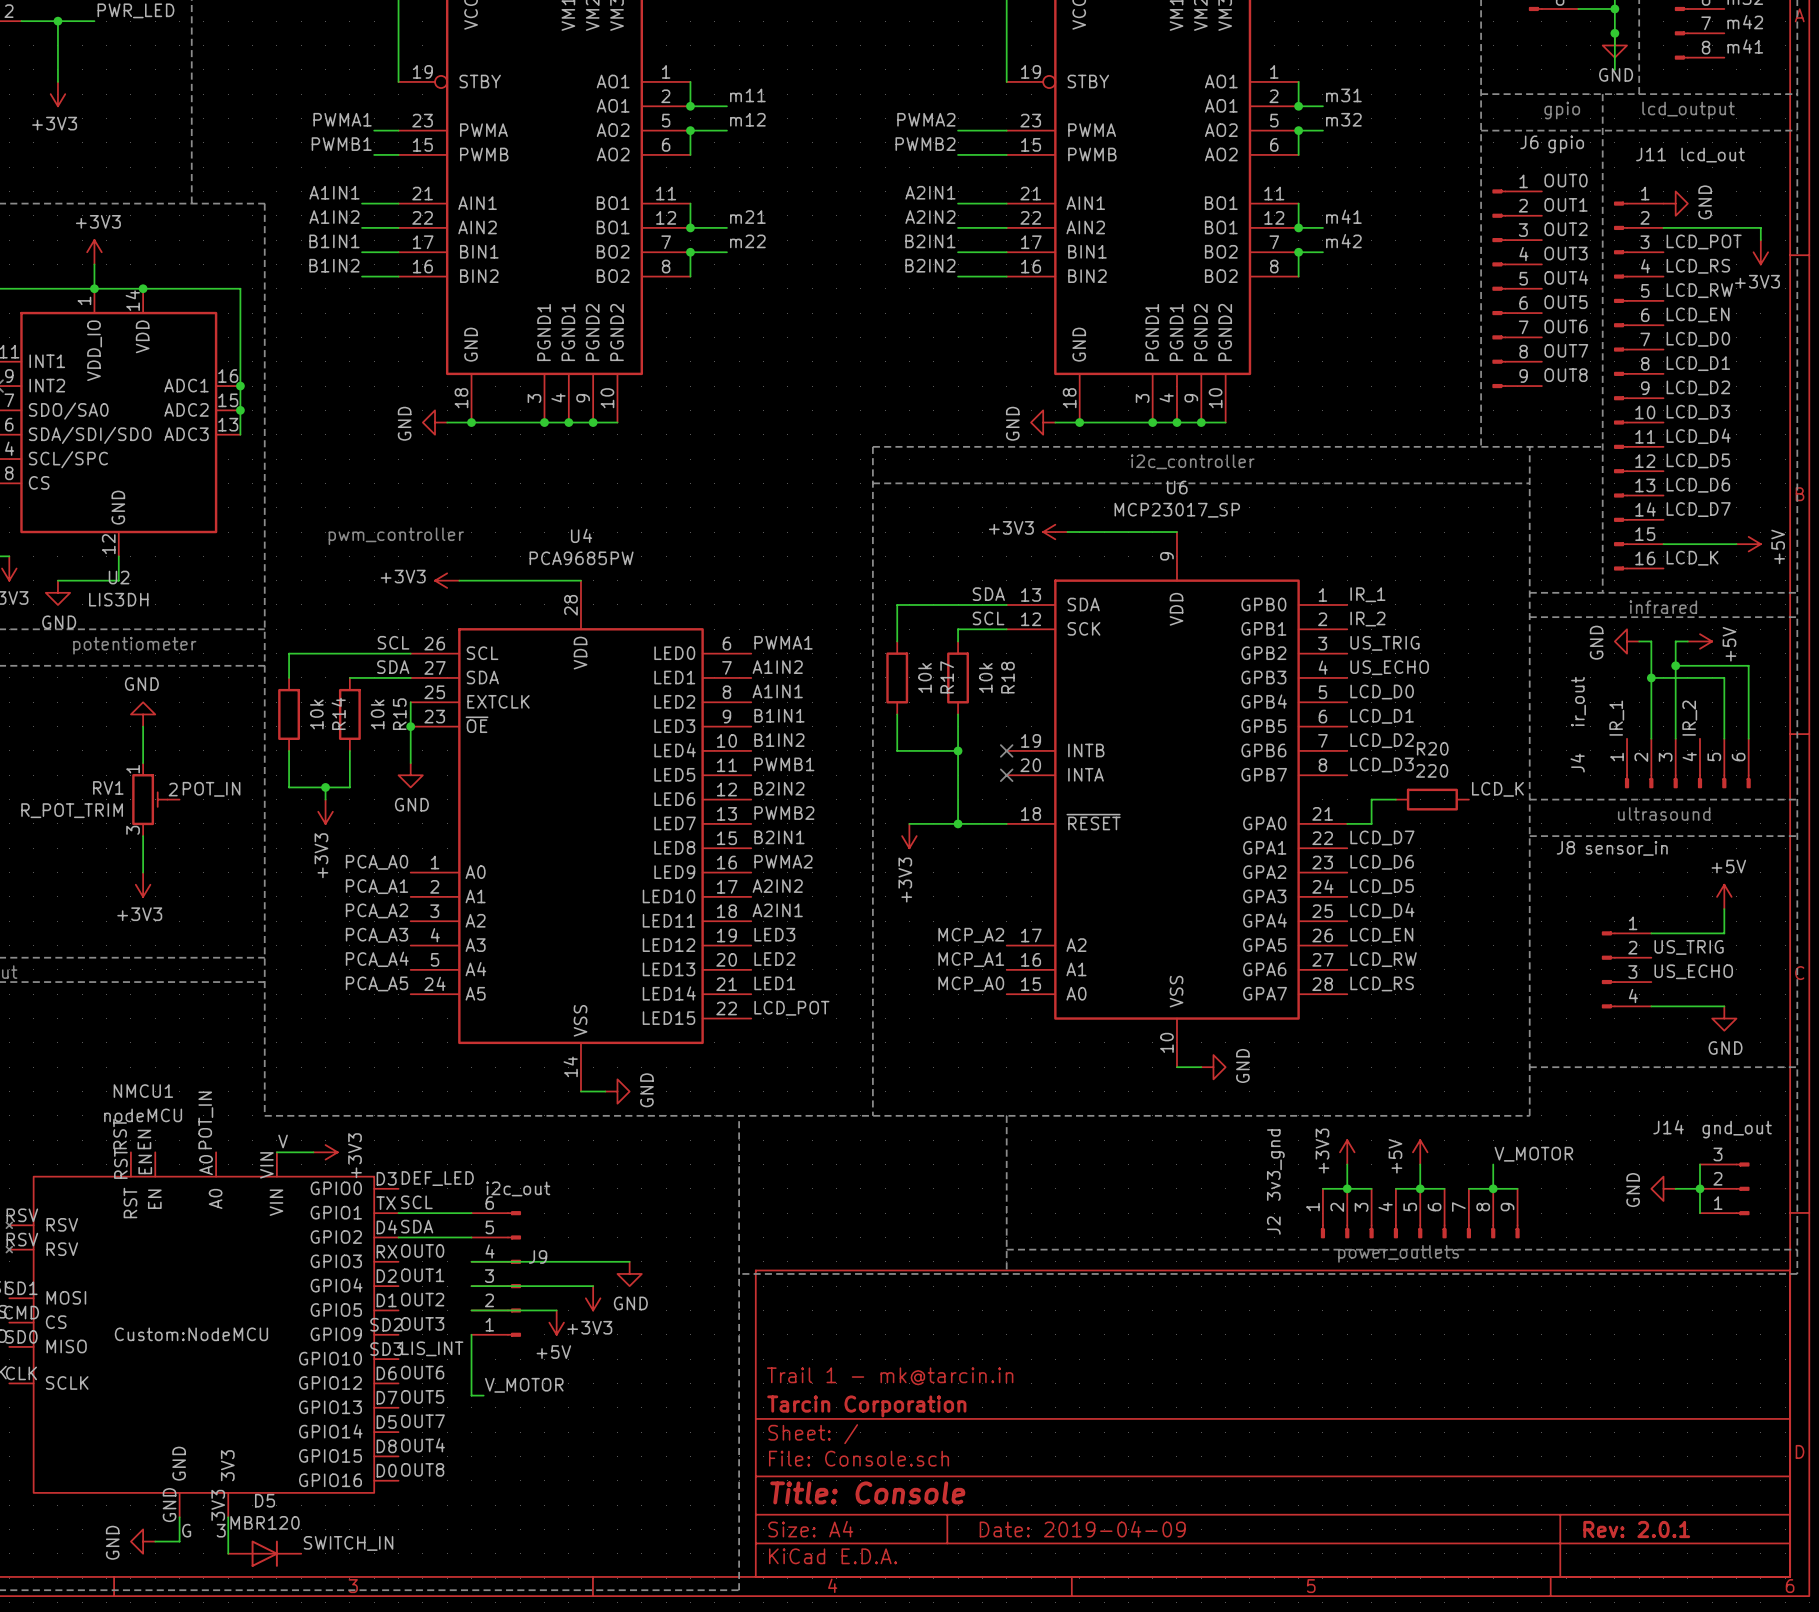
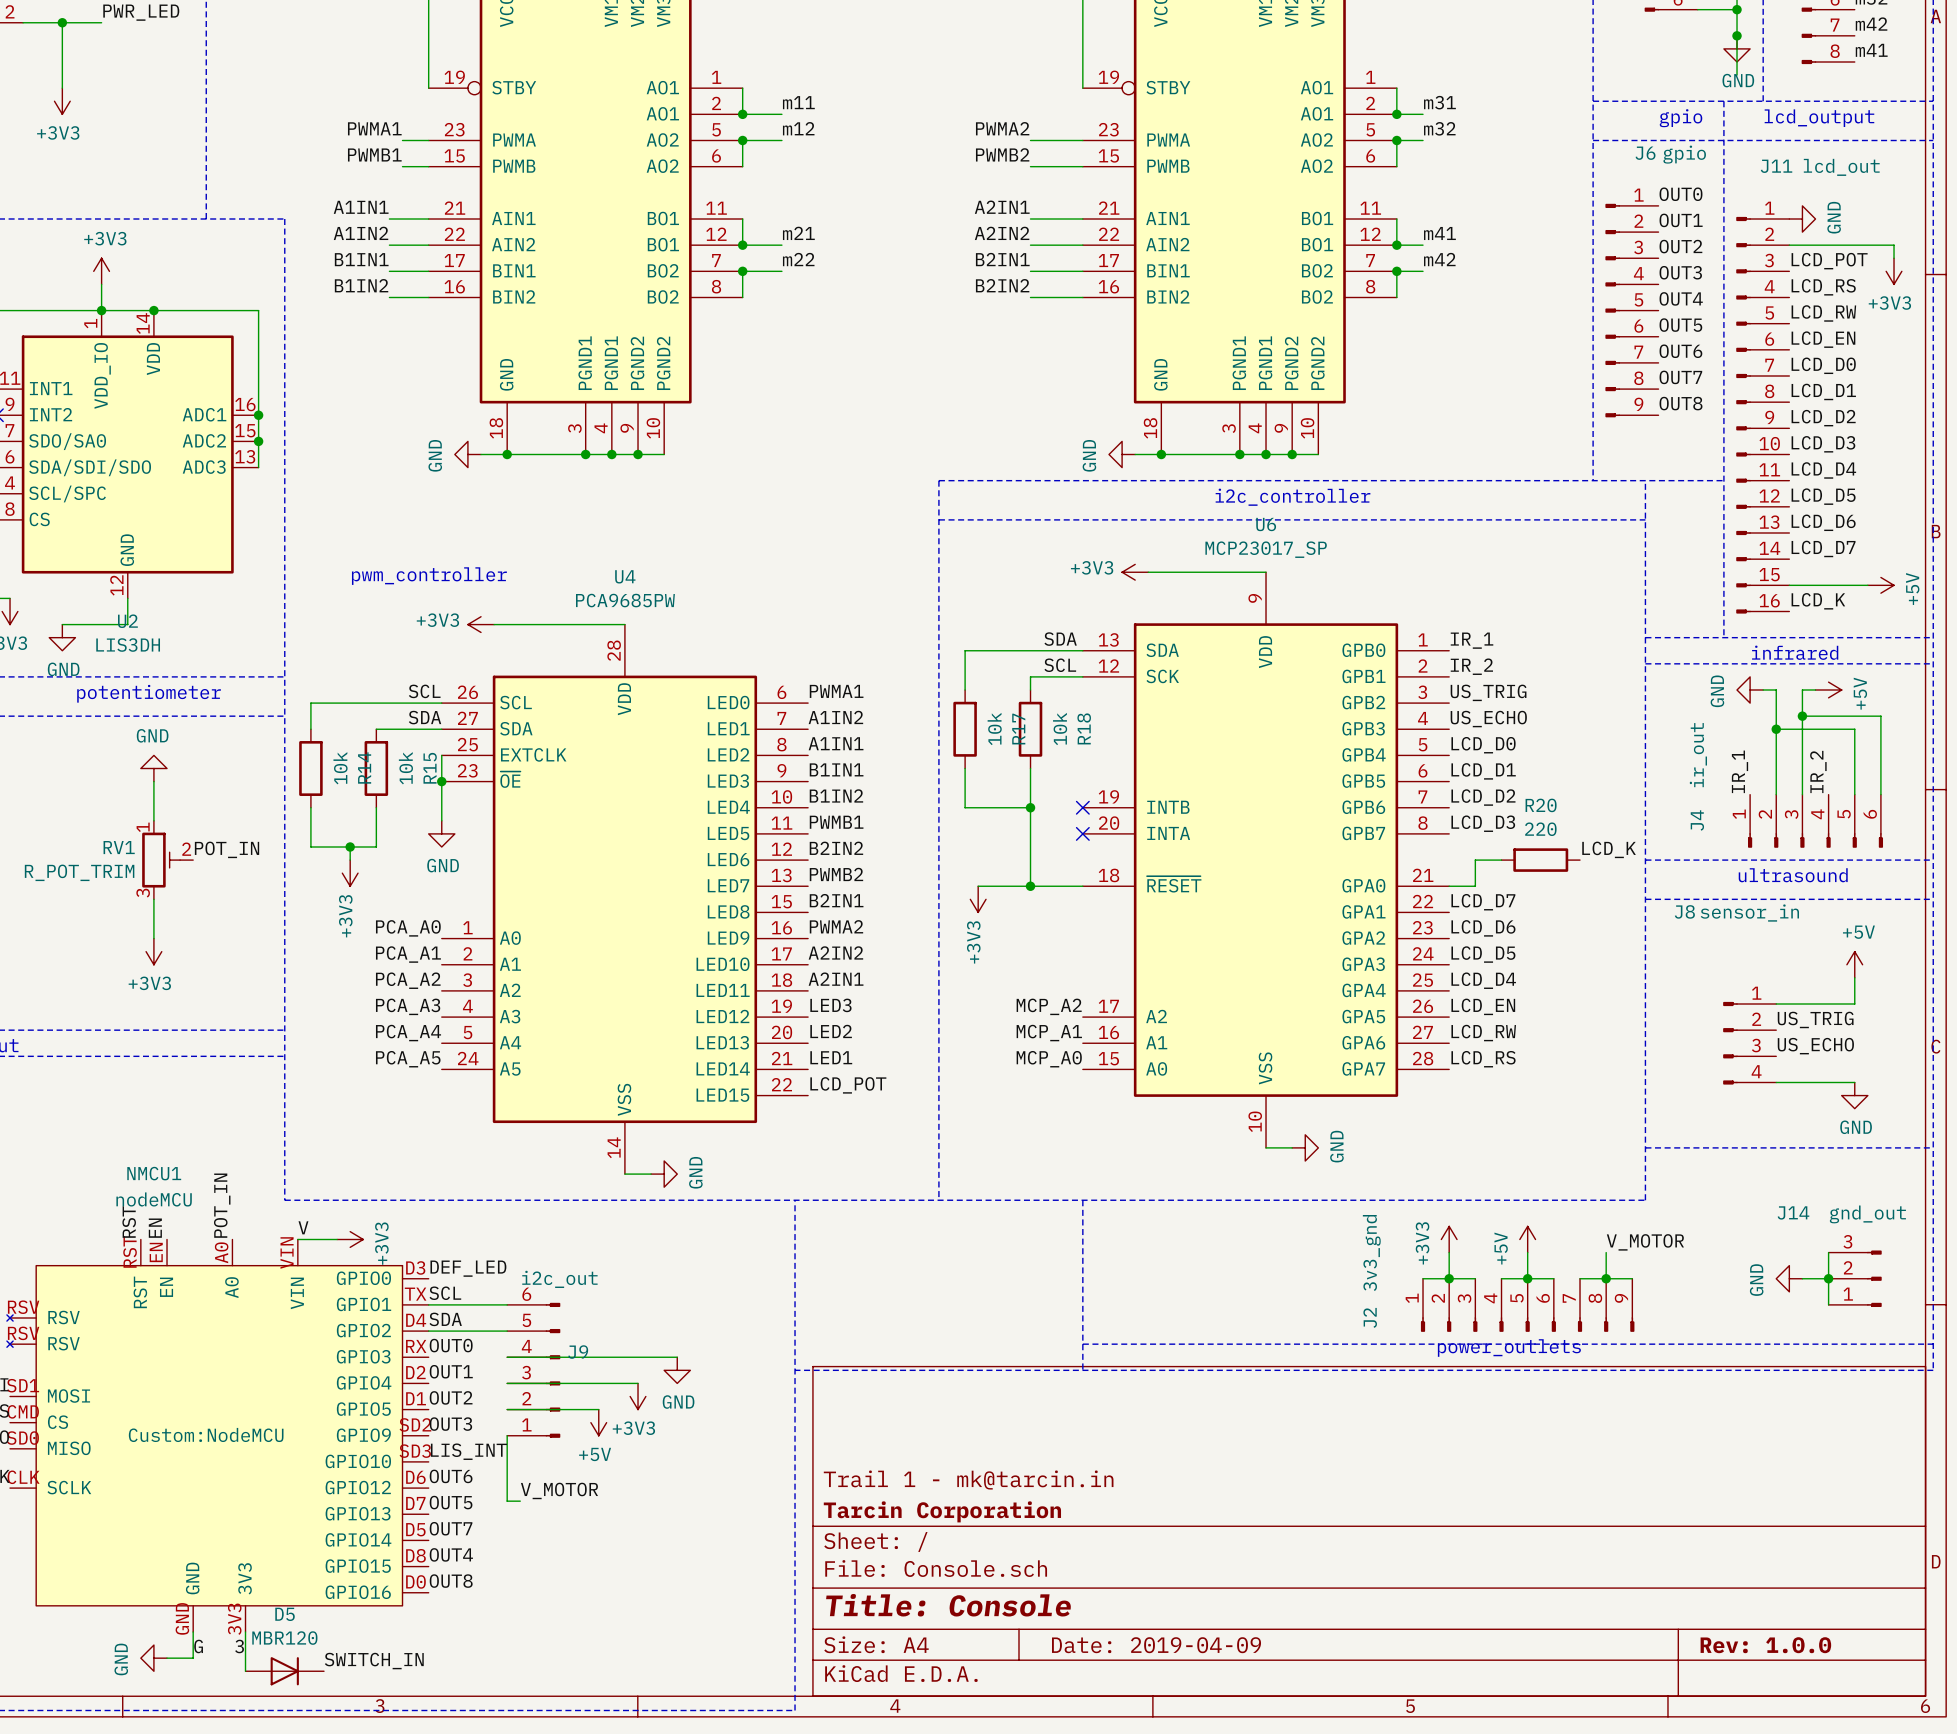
title block: Rev: 2.0.1 (1636, 1529) -> Rev: 1.0.0 (1765, 1645)

